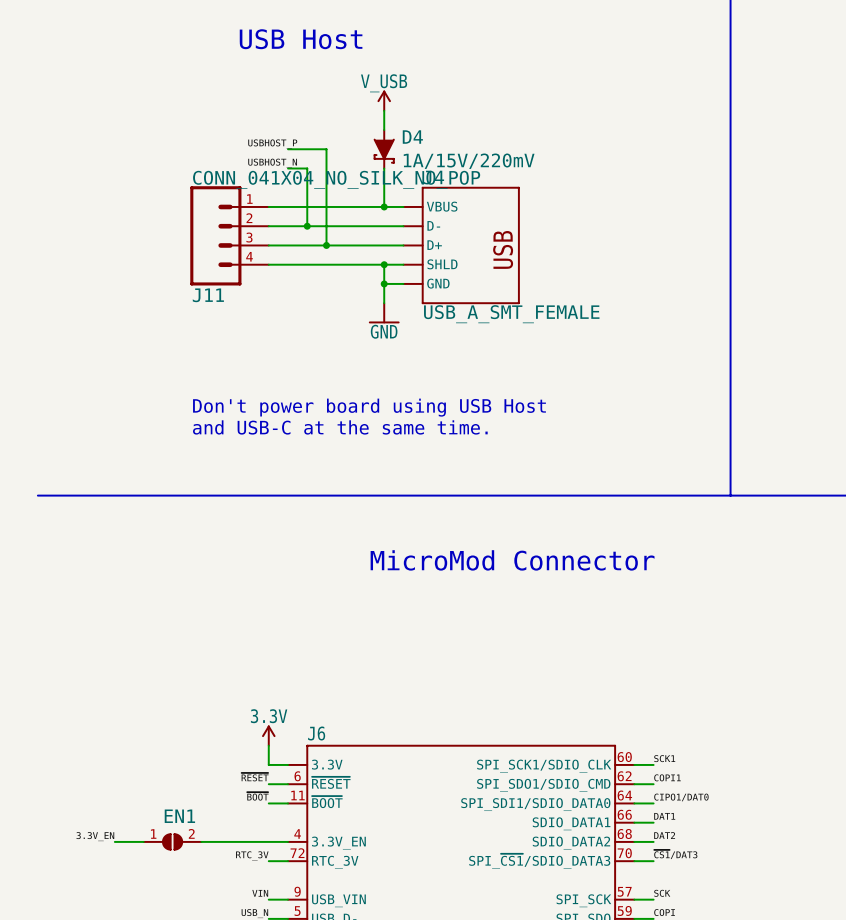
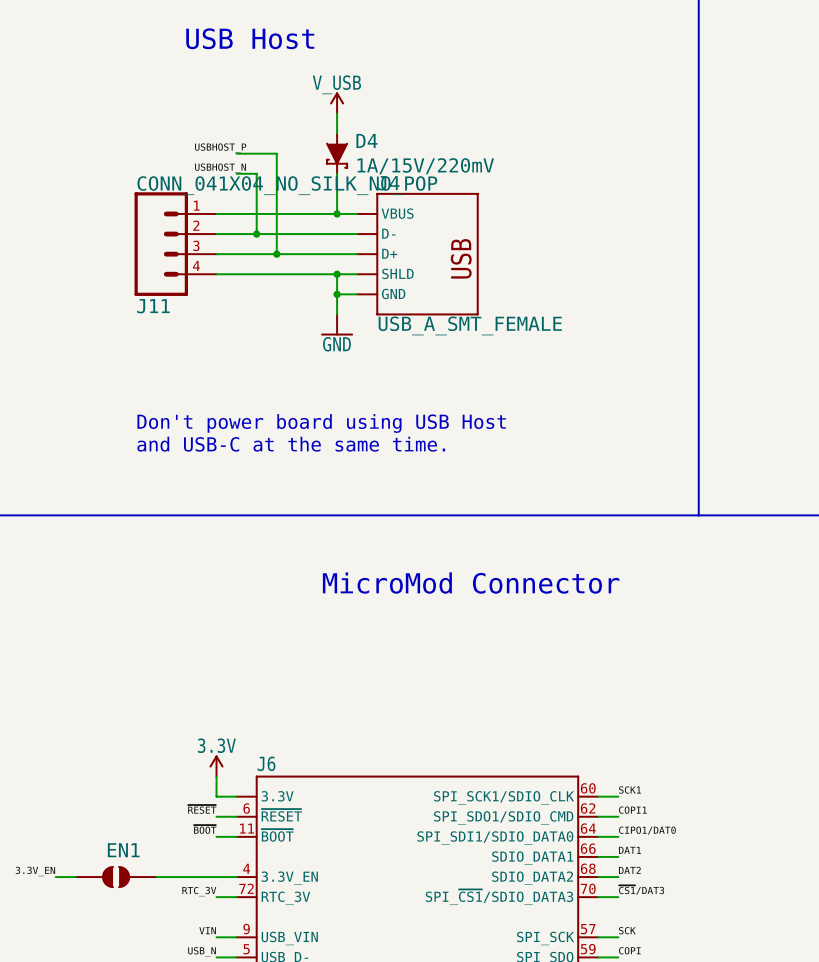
EN1 symbol: [143, 834, 202, 850] -> [75, 867, 157, 888]

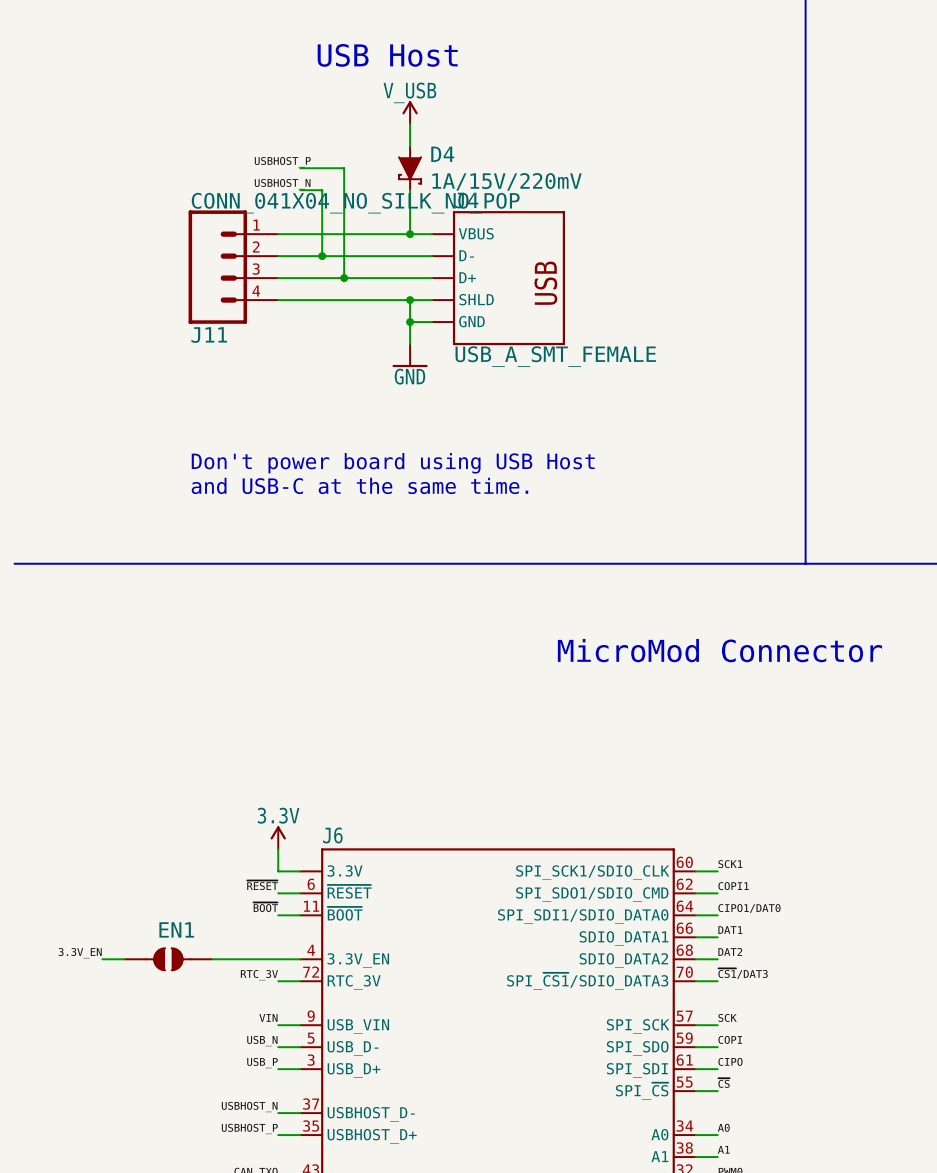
text position: USB Host (250, 38) -> USB Host (387, 55)
text position: MicroMod Connector (471, 583) -> MicroMod Connector (719, 650)

